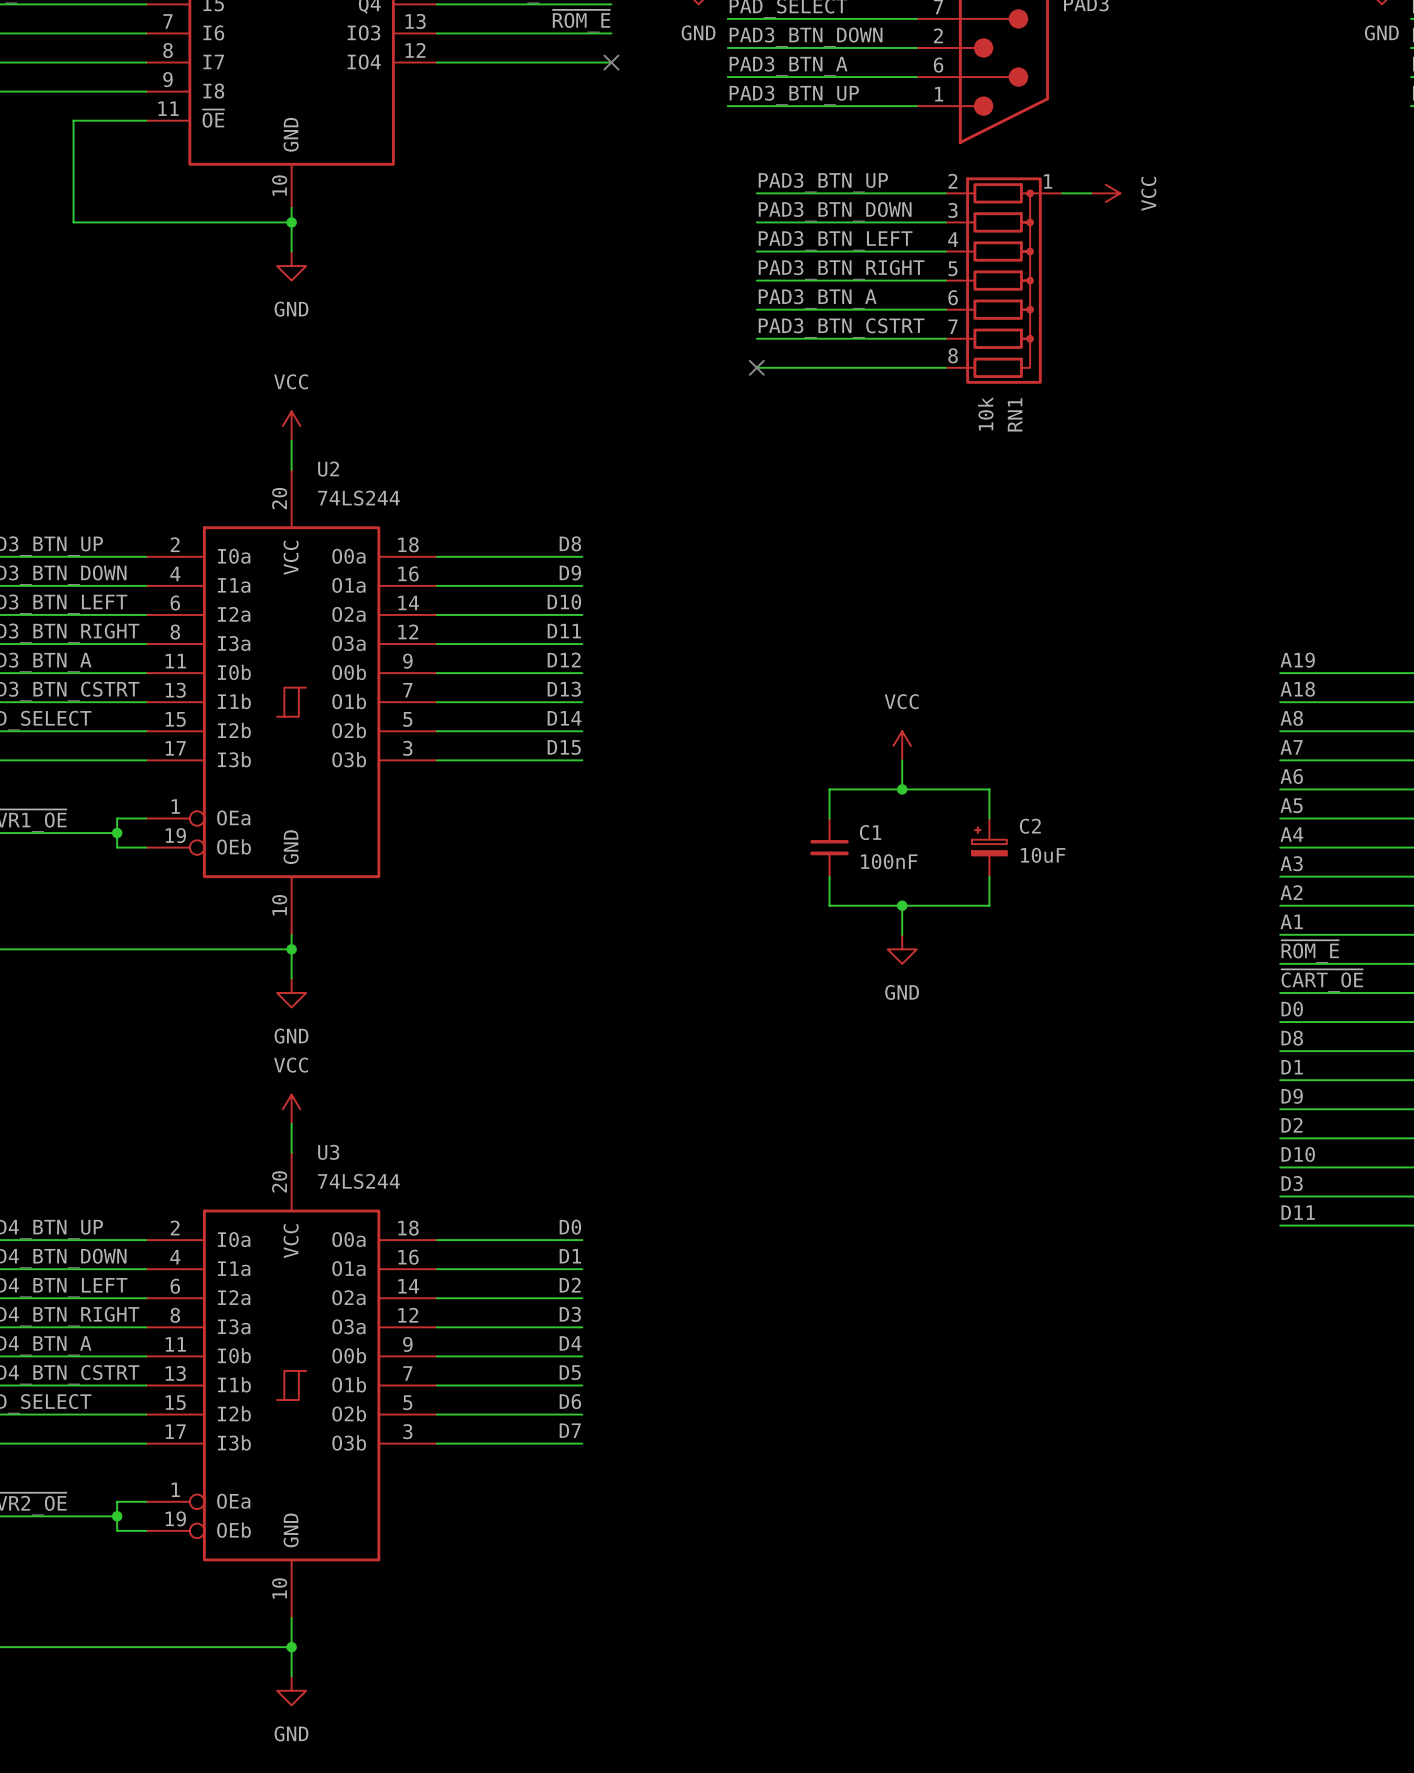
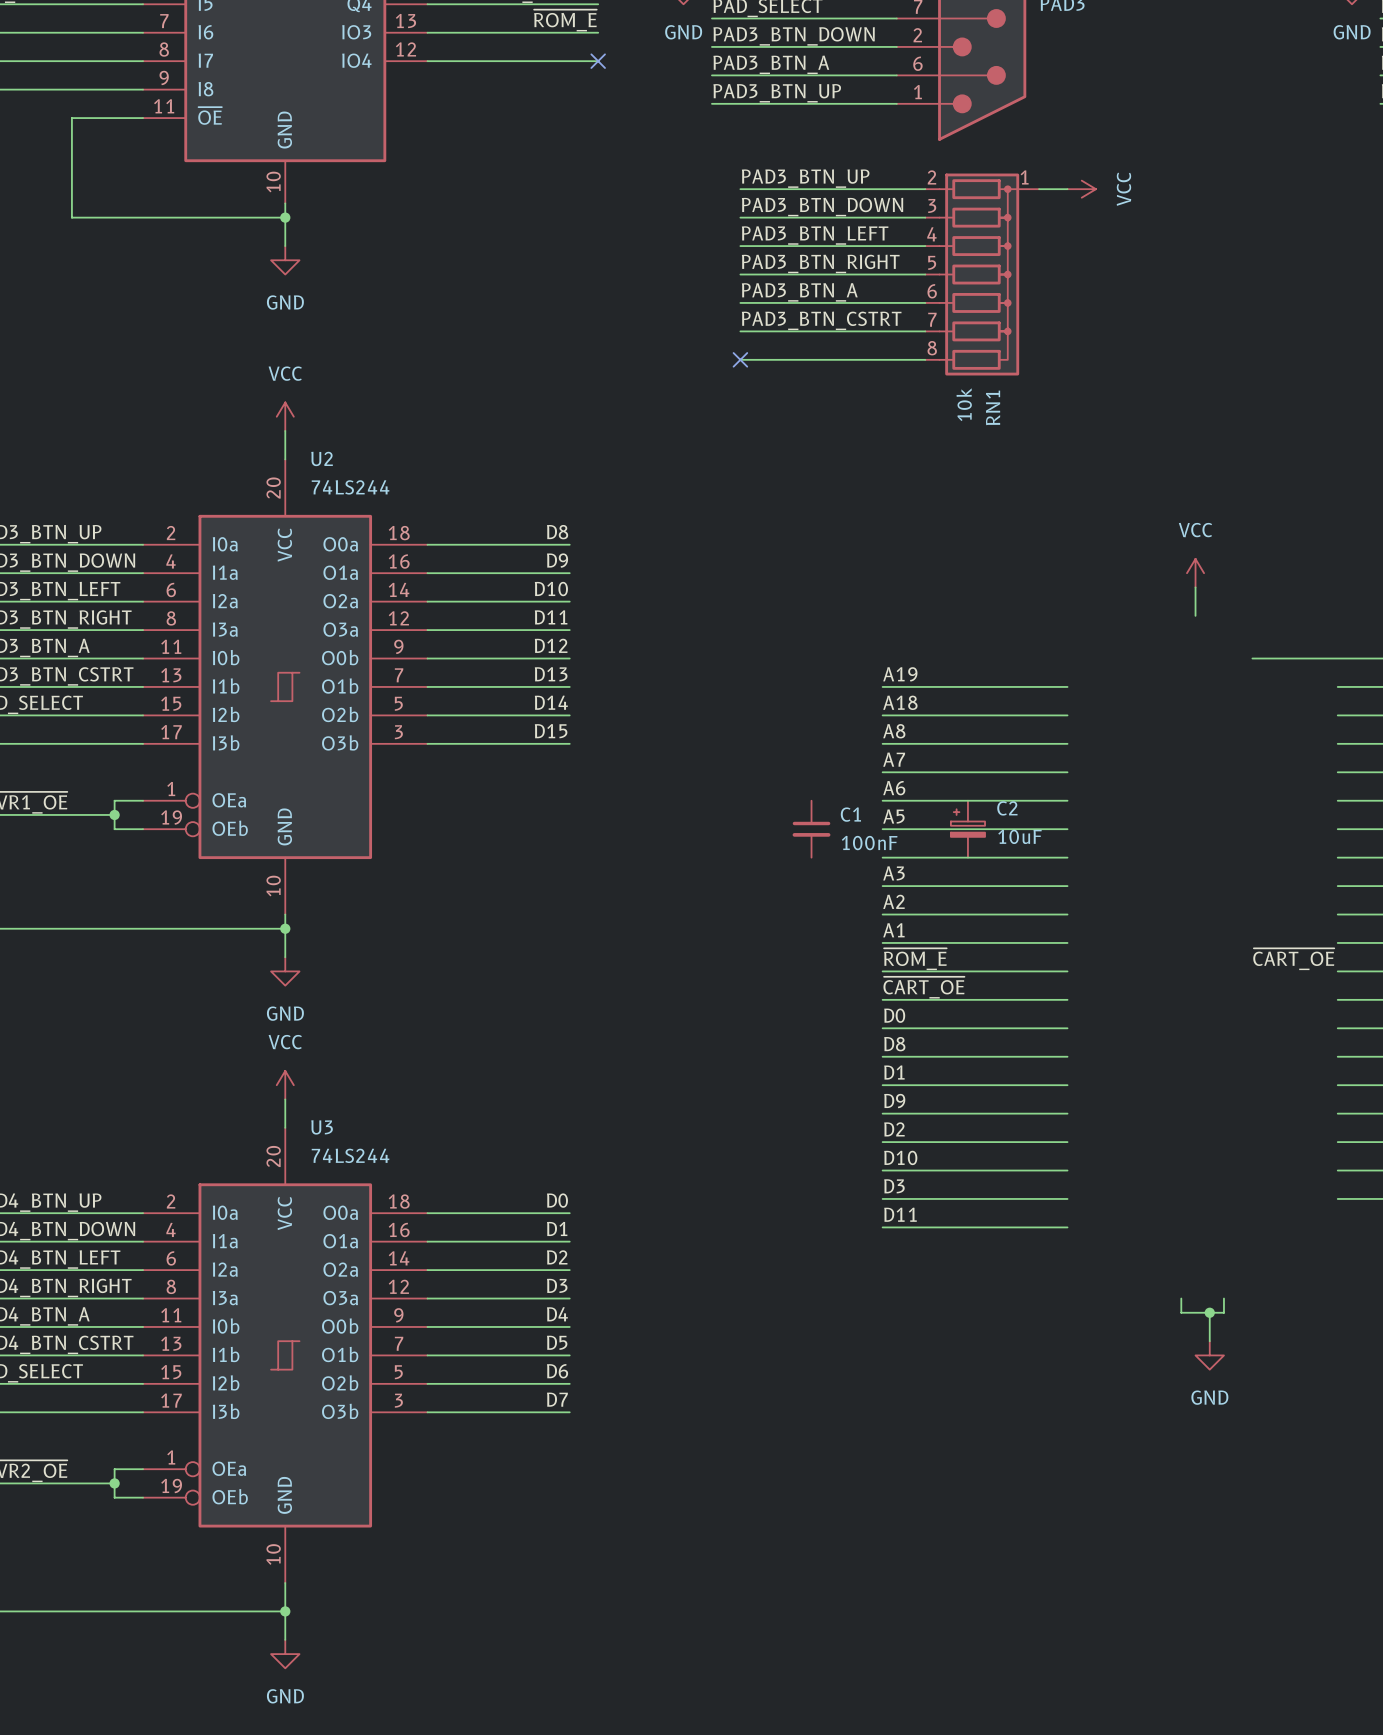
power symbol: none -> VCC (1195, 573)
wire: none -> (1195, 587) (1195, 615)
label: A19 (1297, 660) -> none
label: none -> A19 (900, 674)
label: A18 (1297, 689) -> none
wire: none -> (882, 686) (1067, 686)
wire: (1280, 702) (1367, 702) -> none
label: none -> A18 (900, 702)
label: A8 (1291, 718) -> none
wire: none -> (882, 715) (1067, 715)
wire: (1280, 731) (1367, 731) -> none
power symbol: VCC (902, 745) -> none
label: none -> A8 (894, 731)
label: A7 (1291, 747) -> none
wire: (902, 760) (902, 789) (829, 789) (829, 818) -> (882, 743) (1067, 743)
wire: (1280, 760) (1367, 760) -> none
label: none -> A7 (894, 759)
label: A6 (1291, 776) -> none
junction: (902, 789) -> none
wire: (989, 789) (989, 818) -> (967, 772) (1067, 772)
wire: (1280, 789) (1367, 789) -> none
label: none -> A6 (894, 788)
label: A5 (1291, 805) -> none
wire: none -> (882, 800) (1067, 800)
wire: (1280, 818) (1367, 818) -> none
label: none -> A5 (893, 816)
label: A4 (1291, 834) -> none
wire: none -> (882, 829) (1067, 829)
wire: (1280, 847) (1367, 847) -> none
label: A3 (1291, 863) -> none
wire: (829, 876) (829, 905) (902, 905) (902, 934) -> (1067, 914) (882, 914)
wire: none -> (882, 857) (1067, 857)
wire: (989, 876) (989, 905) -> (1067, 886) (967, 886)
wire: (1280, 876) (1367, 876) -> none
label: none -> A3 (893, 873)
label: A2 (1291, 892) -> none
junction: (902, 905) -> none
wire: (1280, 905) (1367, 905) -> none
label: none -> A2 (893, 901)
label: A1 (1291, 921) -> none
wire: (1280, 934) (1367, 934) -> none
power symbol: GND (902, 949) -> none
label: none -> A1 (893, 930)
label: ~{ROM_E} (1310, 951) -> none
wire: none -> (882, 942) (1067, 942)
wire: (1280, 963) (1367, 963) -> none
label: none -> ~{ROM_E} (915, 959)
wire: none -> (882, 971) (1067, 971)
wire: (1280, 992) (1367, 992) -> none
label: none -> ~{CART_OE} (923, 987)
label: D0 (1292, 1009) -> none
wire: none -> (882, 999) (1067, 999)
wire: (1280, 1022) (1367, 1022) -> none
label: none -> D0 (894, 1015)
label: D8 (1292, 1038) -> none
wire: none -> (882, 1028) (1067, 1028)
wire: (1280, 1051) (1367, 1051) -> none
label: none -> D8 (894, 1044)
label: D1 (1292, 1067) -> none
wire: none -> (882, 1056) (1067, 1056)
wire: (1280, 1080) (1367, 1080) -> none
label: none -> D1 (894, 1072)
label: D9 (1292, 1096) -> none
wire: none -> (882, 1085) (1067, 1085)
wire: (1280, 1109) (1367, 1109) -> none
label: none -> D9 (894, 1101)
label: D2 (1292, 1125) -> none
wire: none -> (882, 1113) (1067, 1113)
wire: (1280, 1138) (1367, 1138) -> none
label: none -> D2 (894, 1129)
label: D10 (1298, 1154) -> none
wire: none -> (882, 1142) (1067, 1142)
wire: (1280, 1167) (1367, 1167) -> none
label: none -> D10 (900, 1157)
label: D3 (1292, 1183) -> none
wire: none -> (882, 1170) (1067, 1170)
wire: (1280, 1196) (1367, 1196) -> none
label: none -> D3 (894, 1186)
label: D11 (1298, 1212) -> none
wire: none -> (882, 1198) (1067, 1198)
wire: (1280, 1225) (1367, 1225) -> none
label: none -> D11 (900, 1214)
wire: none -> (882, 1227) (1067, 1227)
wire: none -> (1181, 1298) (1181, 1312) (1223, 1312) (1223, 1298)
wire: none -> (1209, 1312) (1209, 1341)
junction: none -> (1209, 1312)
power symbol: none -> GND (1209, 1355)

